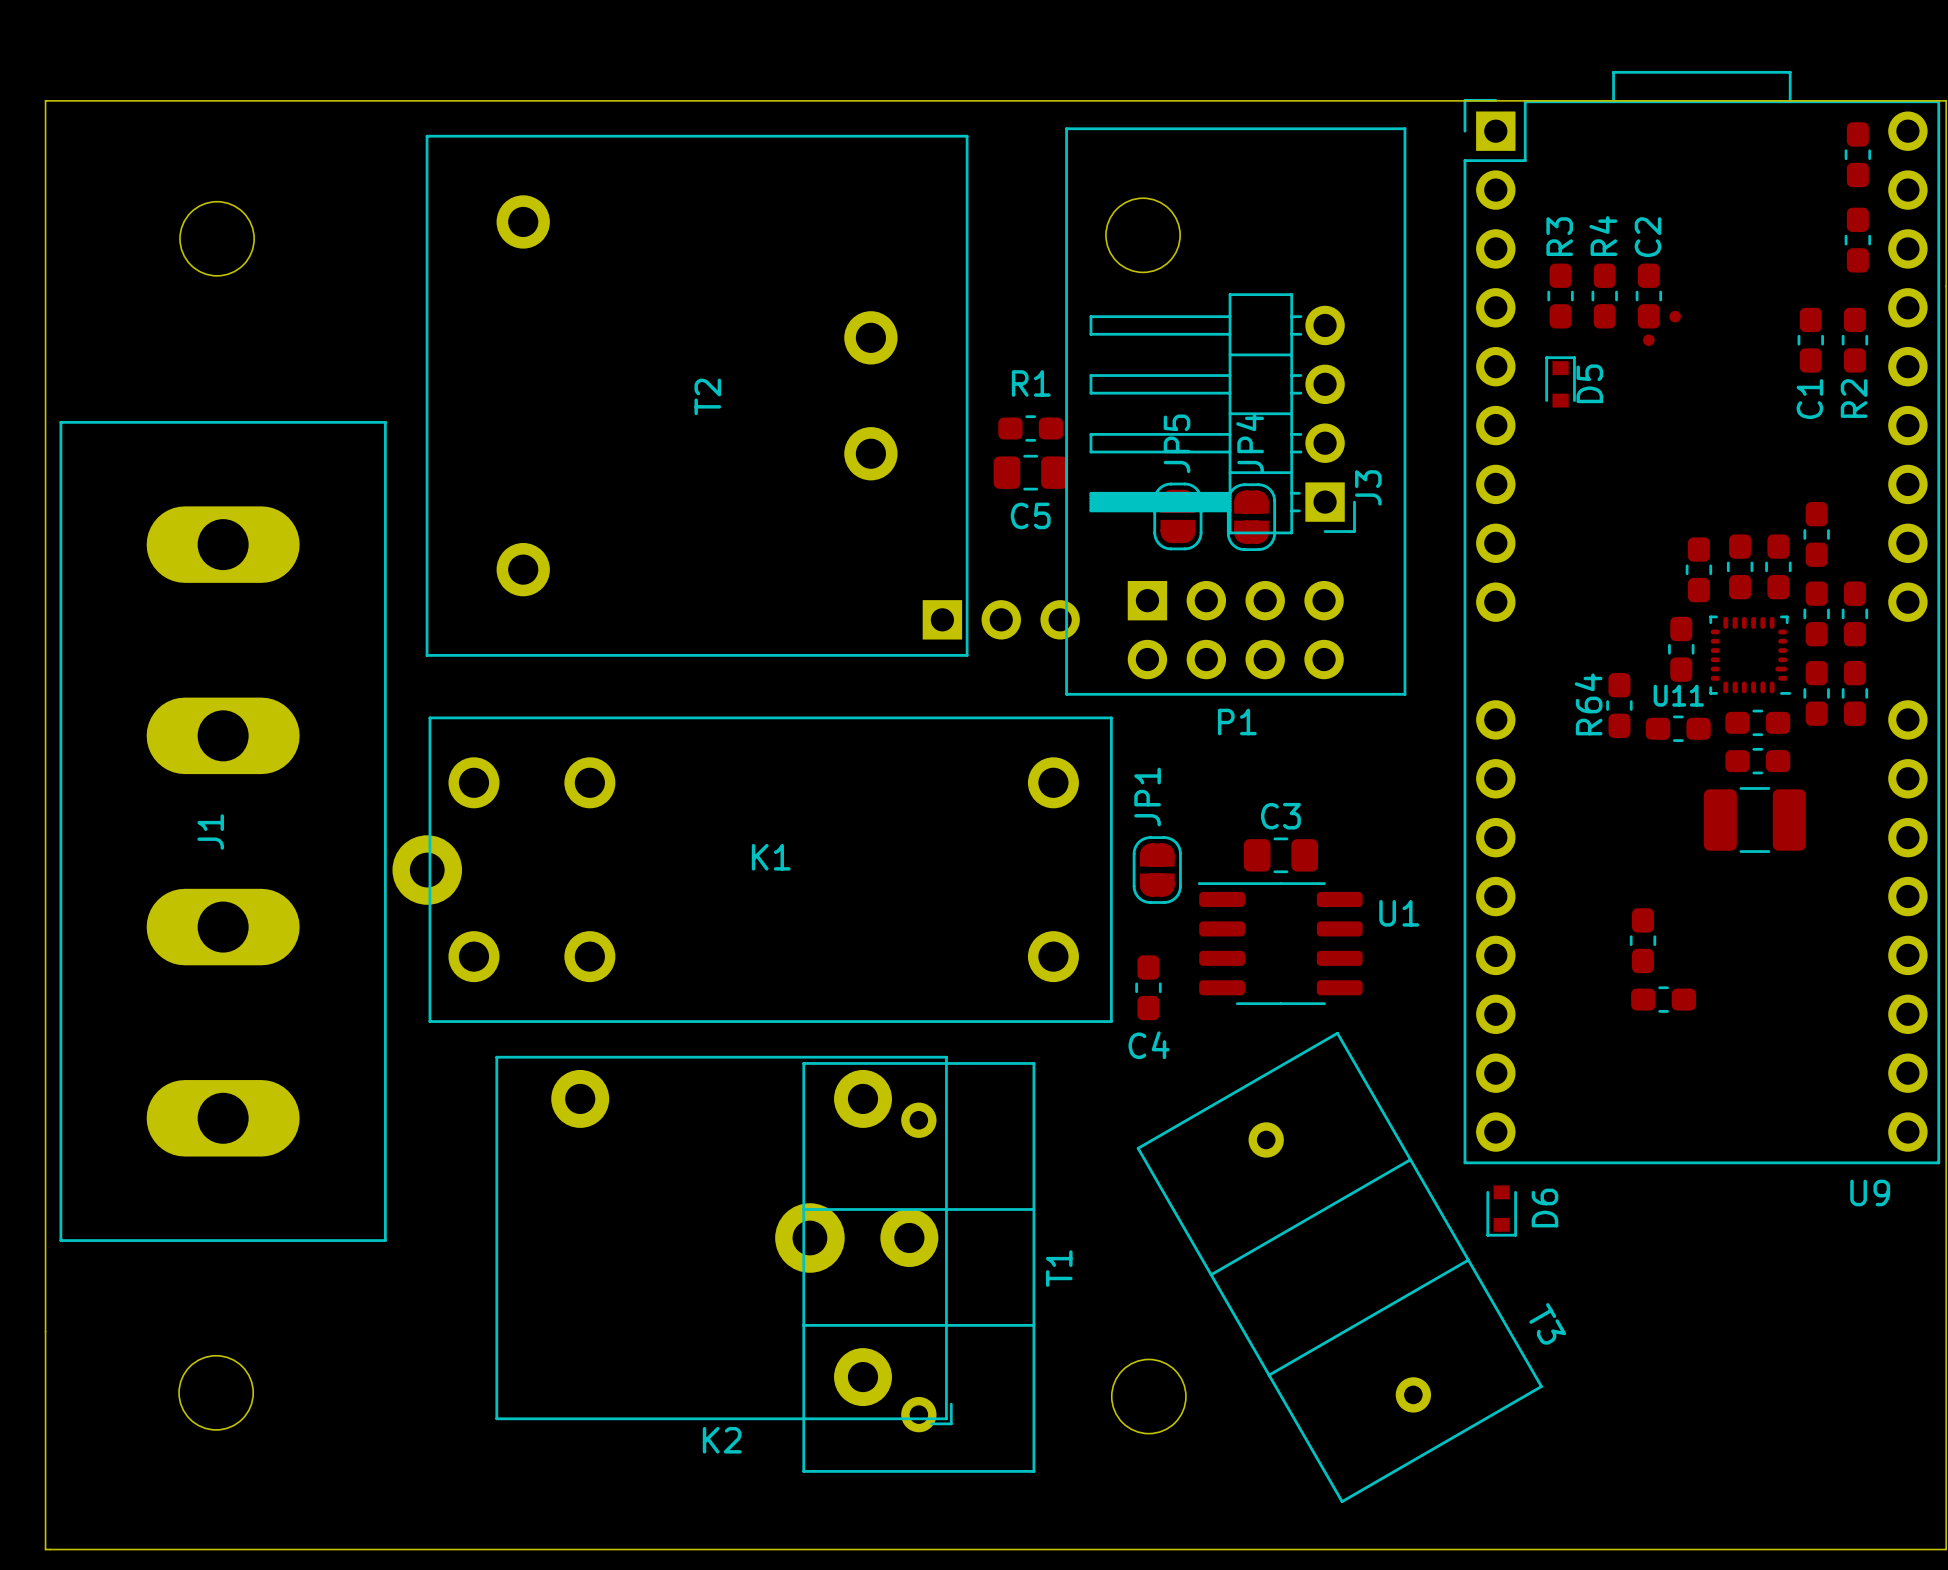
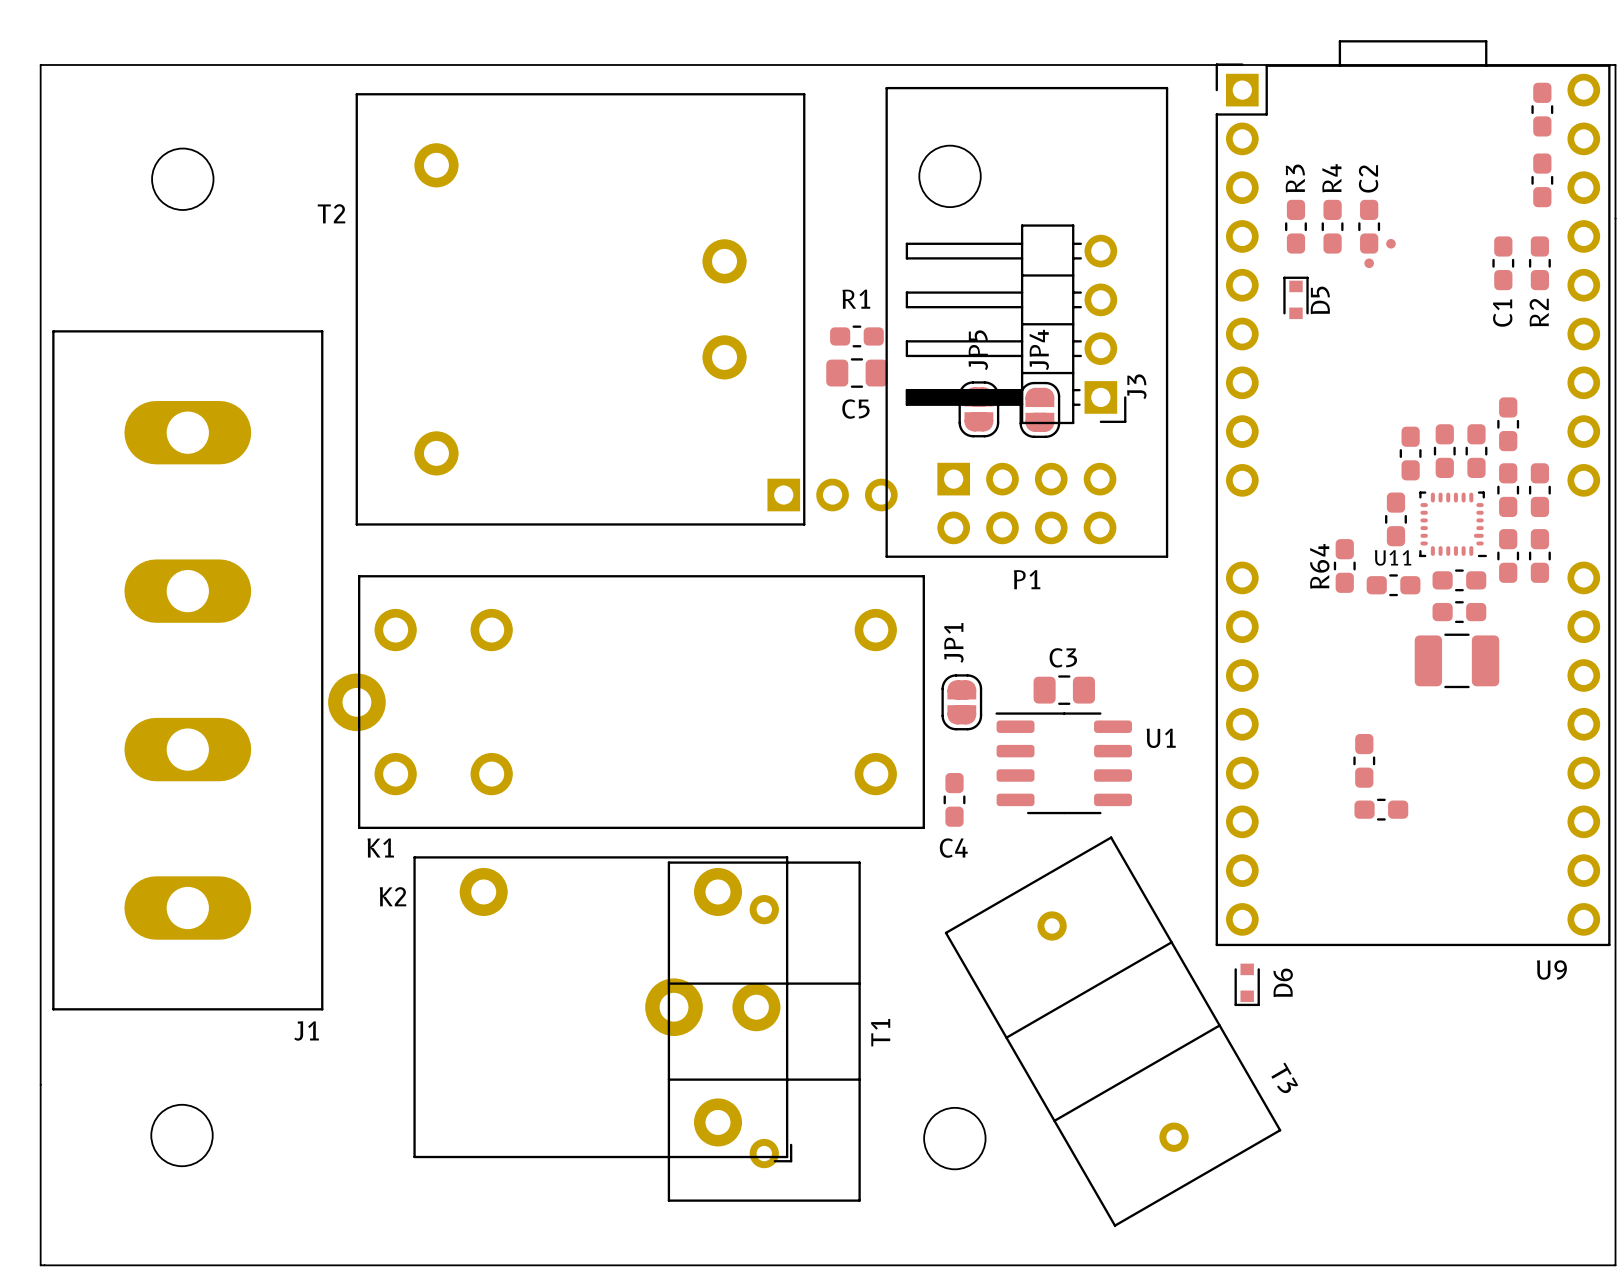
T2 name rotation: 0° (707, 396) -> 90° clockwise (331, 213)
T2 name position: T2 (707, 396) -> T2 (331, 213)
J1 name rotation: 0° (210, 832) -> 90° clockwise (306, 1030)
J1 name position: J1 (210, 832) -> J1 (306, 1030)
K1 name position: K1 (771, 857) -> K1 (380, 847)
K2 name position: K2 (722, 1440) -> K2 (392, 896)

